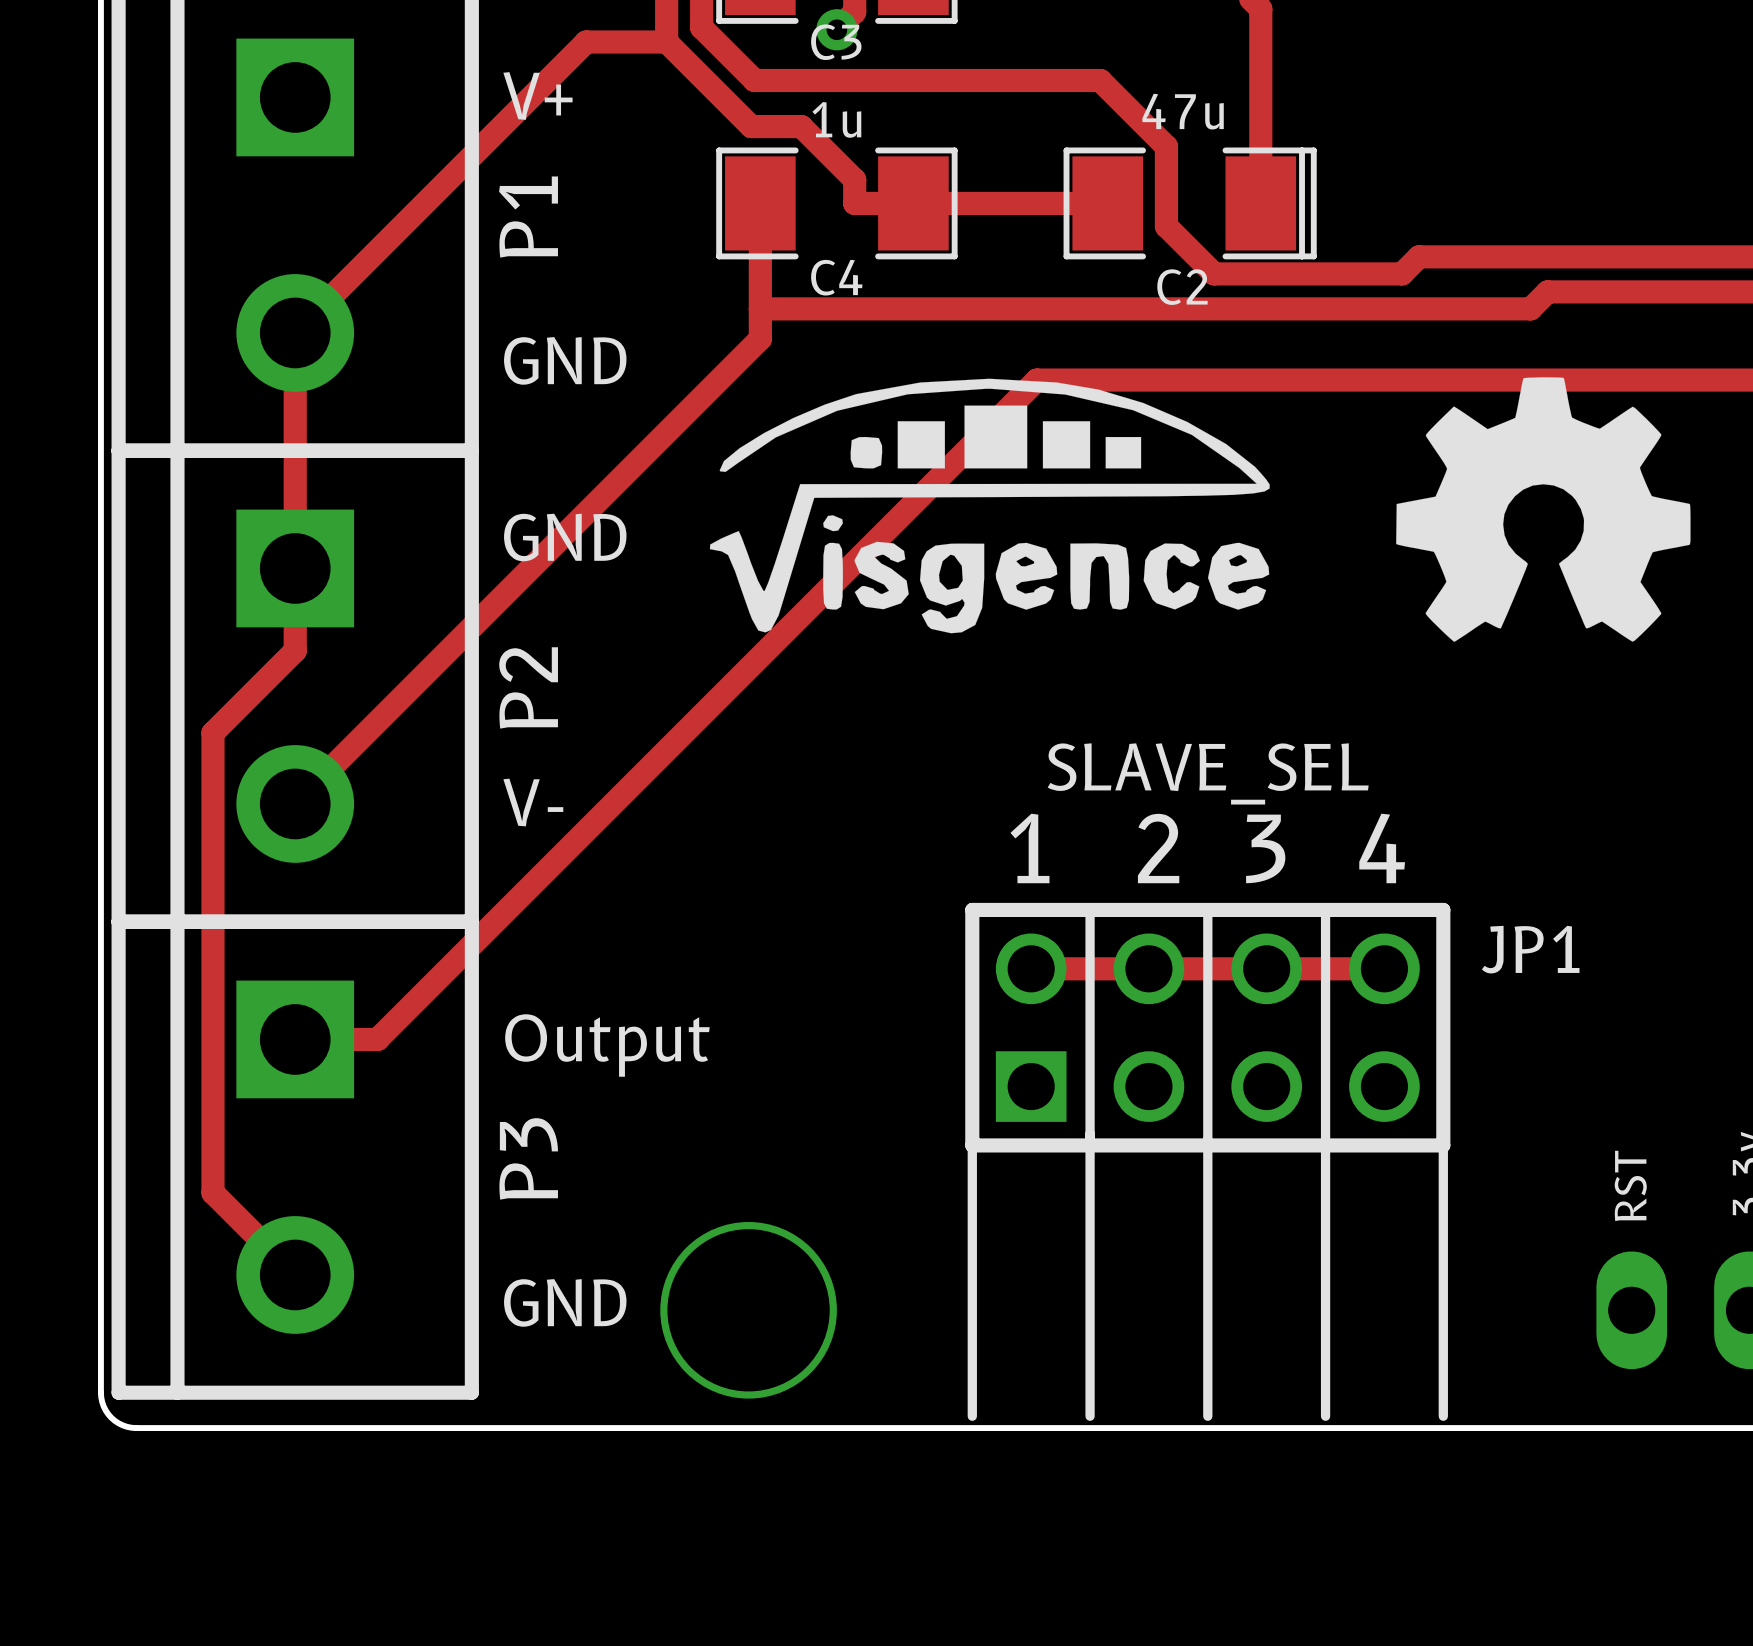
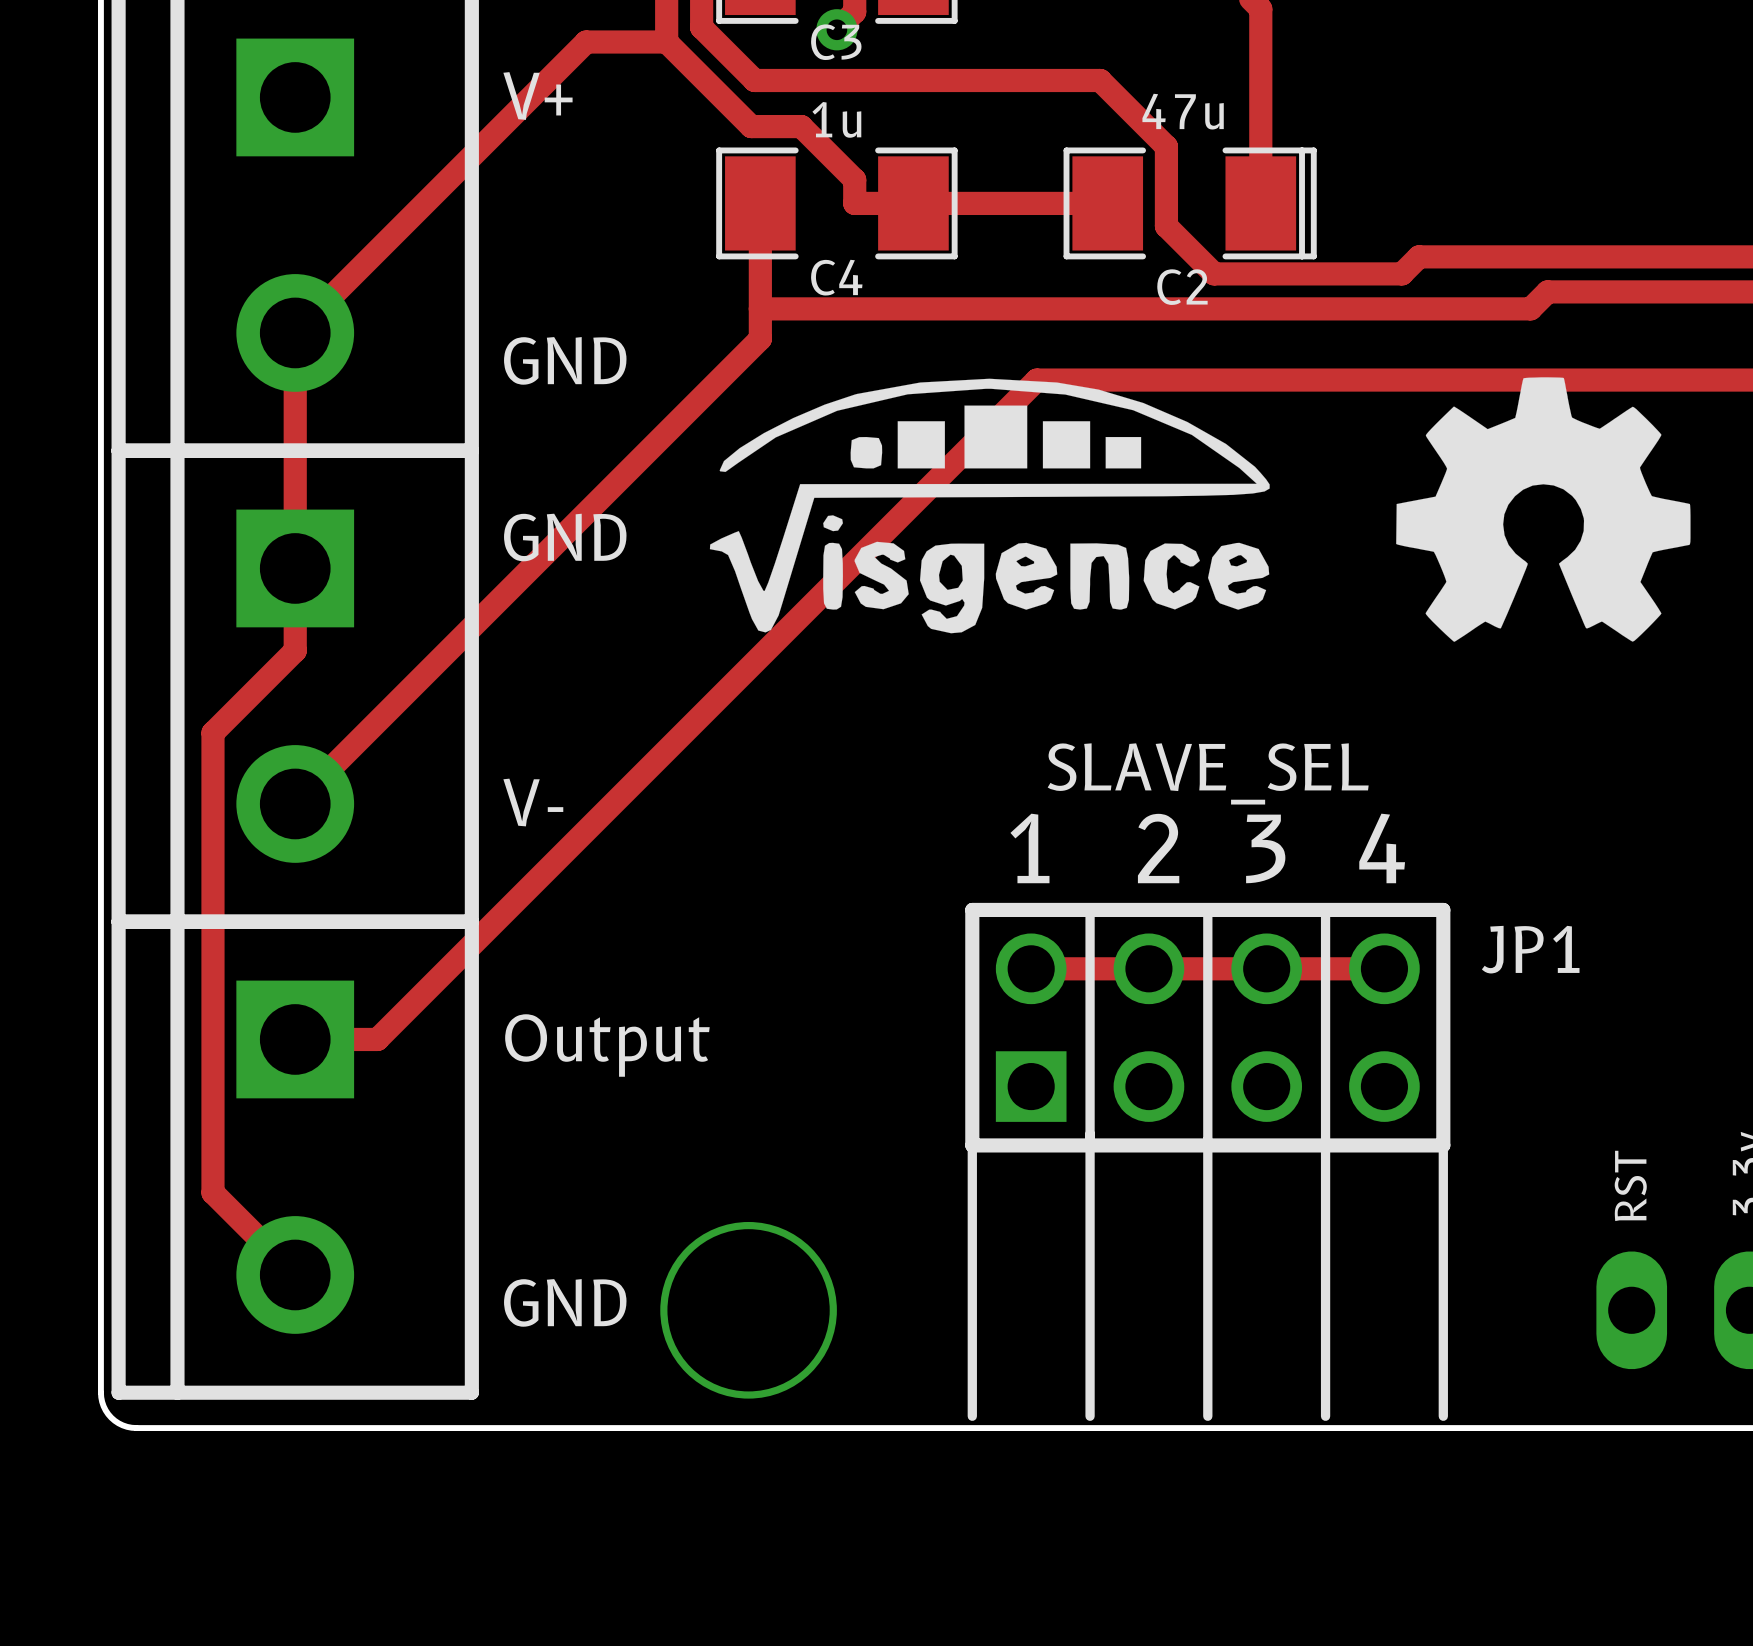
P1 name: P1 (528, 217) -> none
P2 name: P2 (528, 687) -> none
P3 name: P3 (528, 1158) -> none

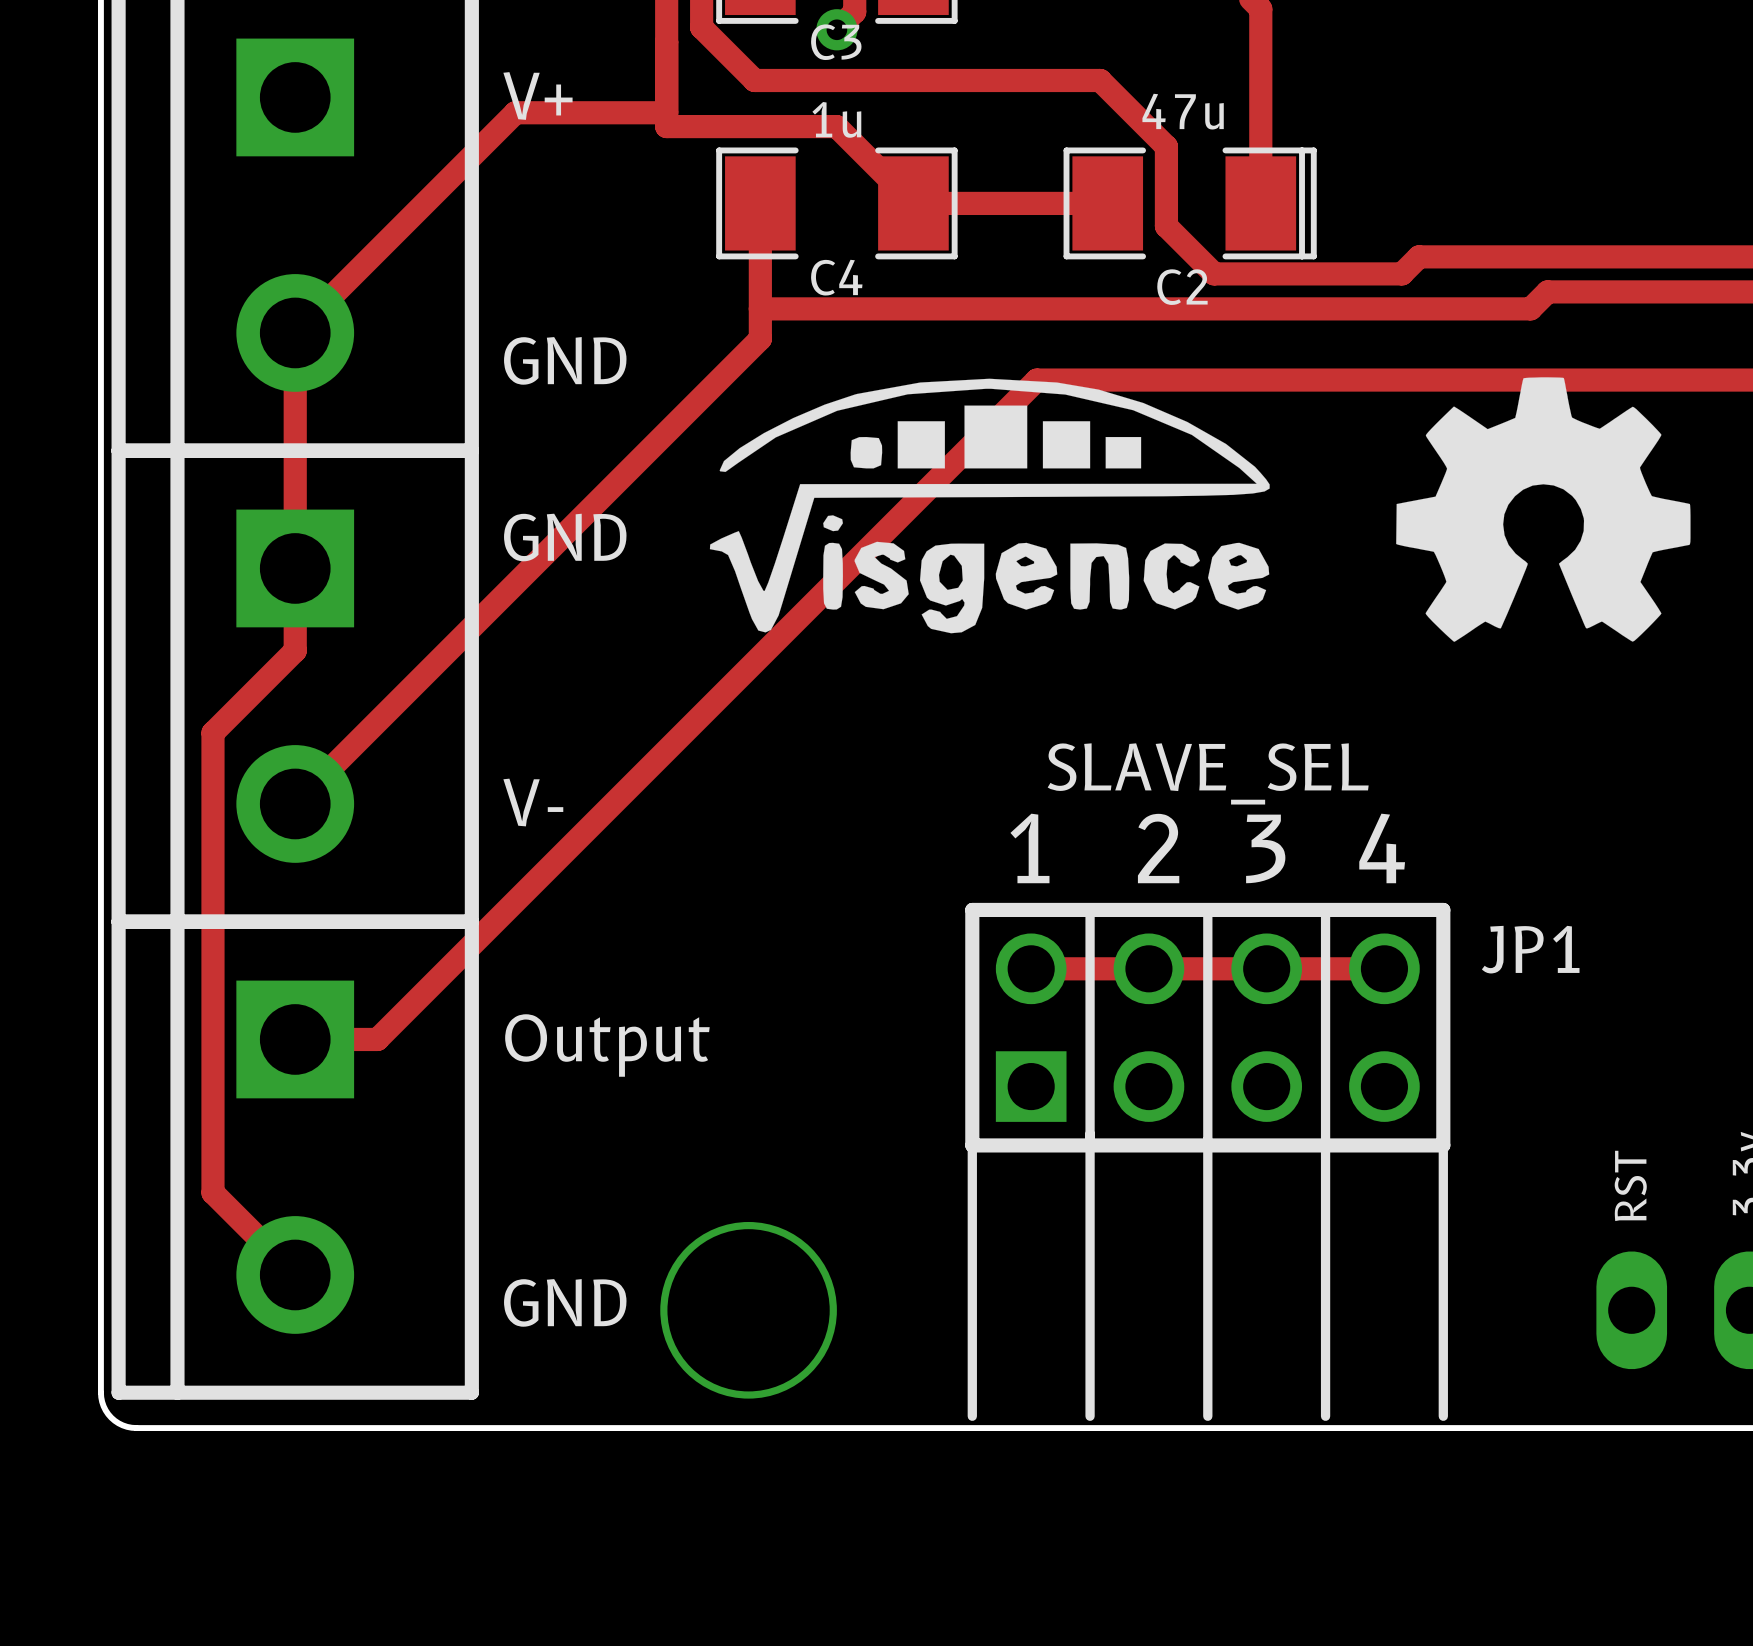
track: none -> (666, 42) (666, 126) (751, 126)
track: (515, 112) (586, 42) (666, 42) (751, 126) -> (515, 112) (666, 112)
track: (801, 126) (854, 179) (854, 203) (913, 203) -> (801, 126) (836, 126) (913, 203)

